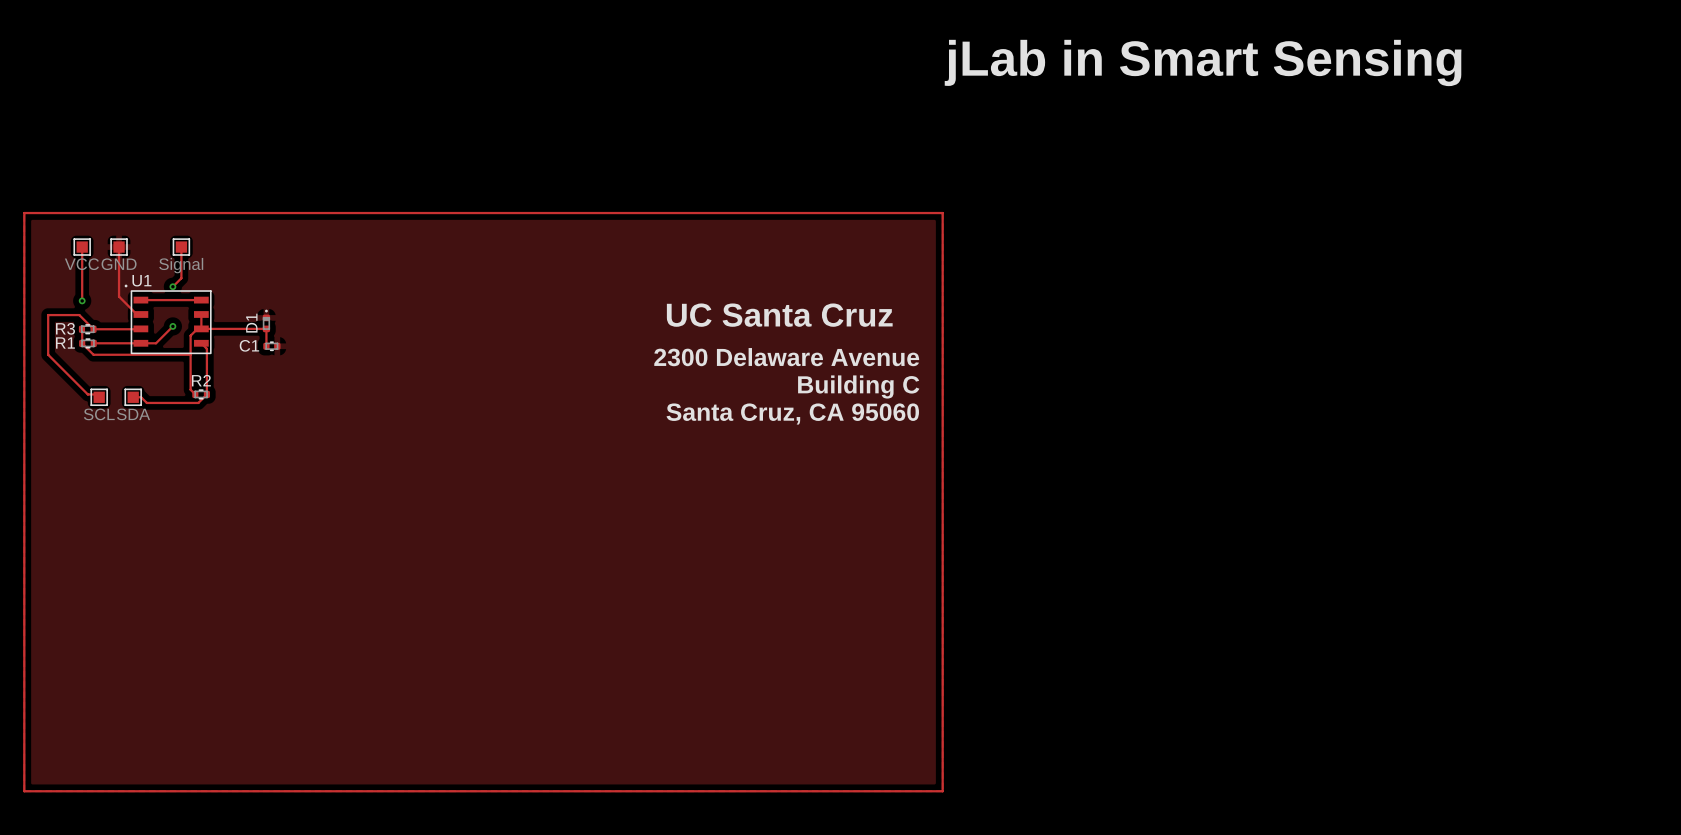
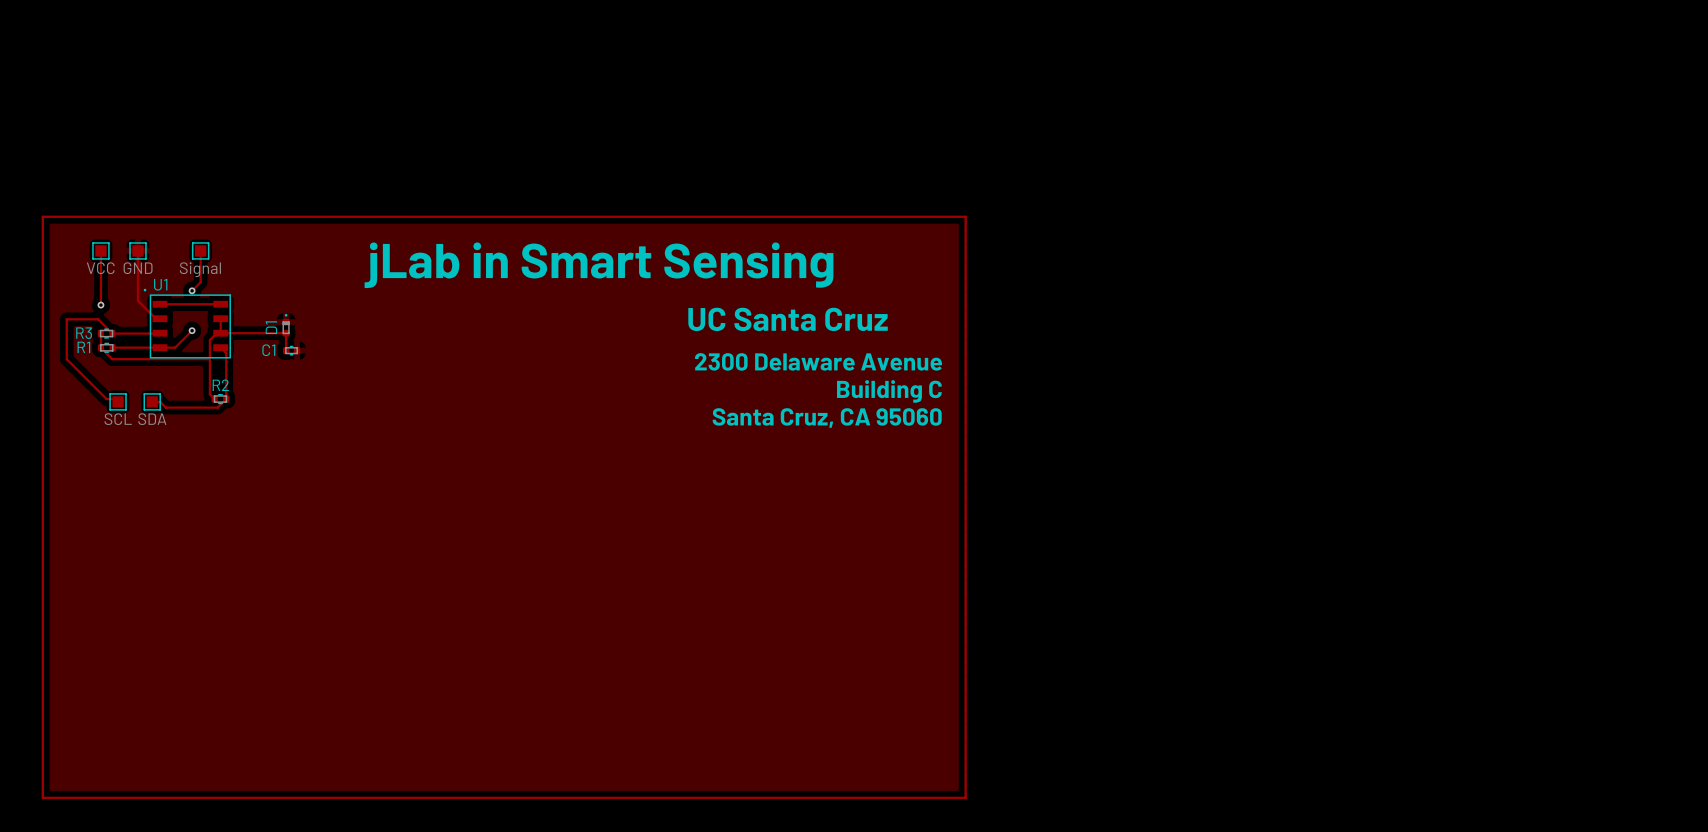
text: jLab in Smart Sensing (1203, 62) -> none
text: none -> jLab in Smart Sensing (598, 265)

